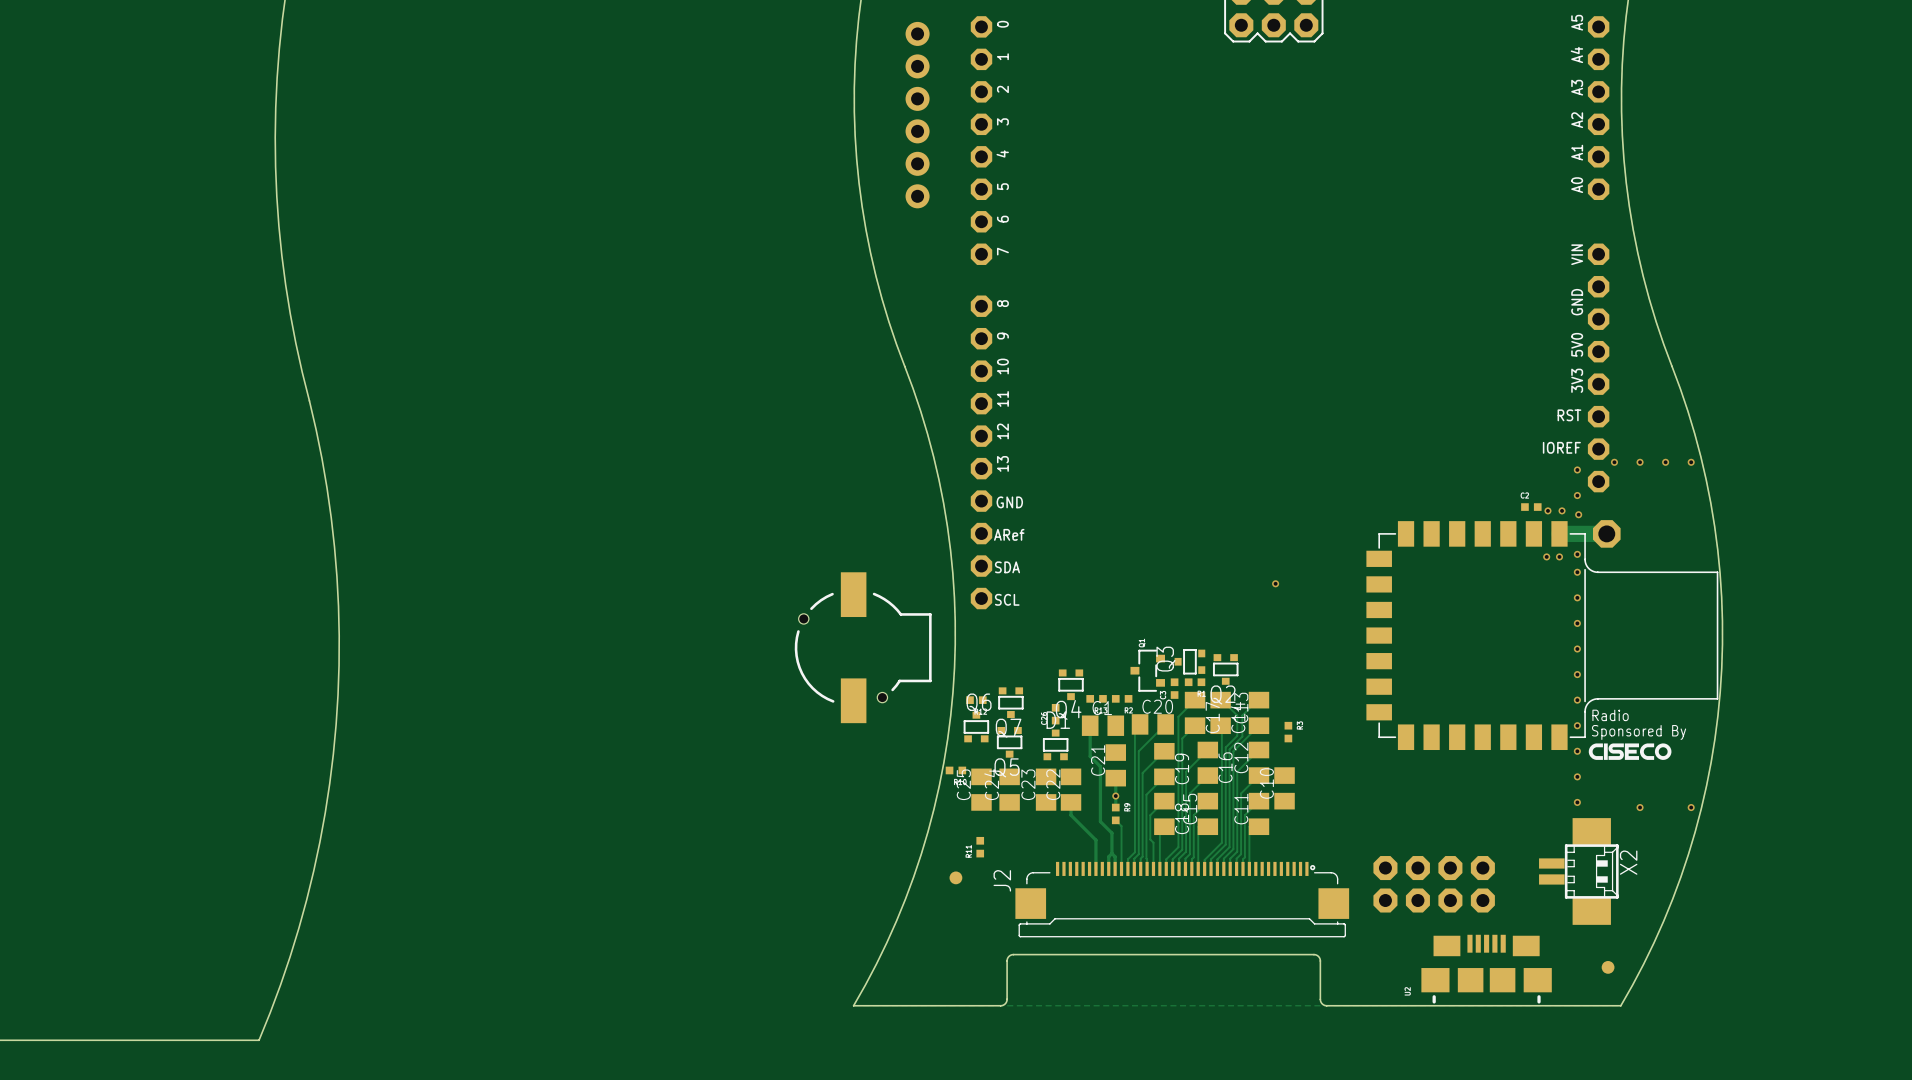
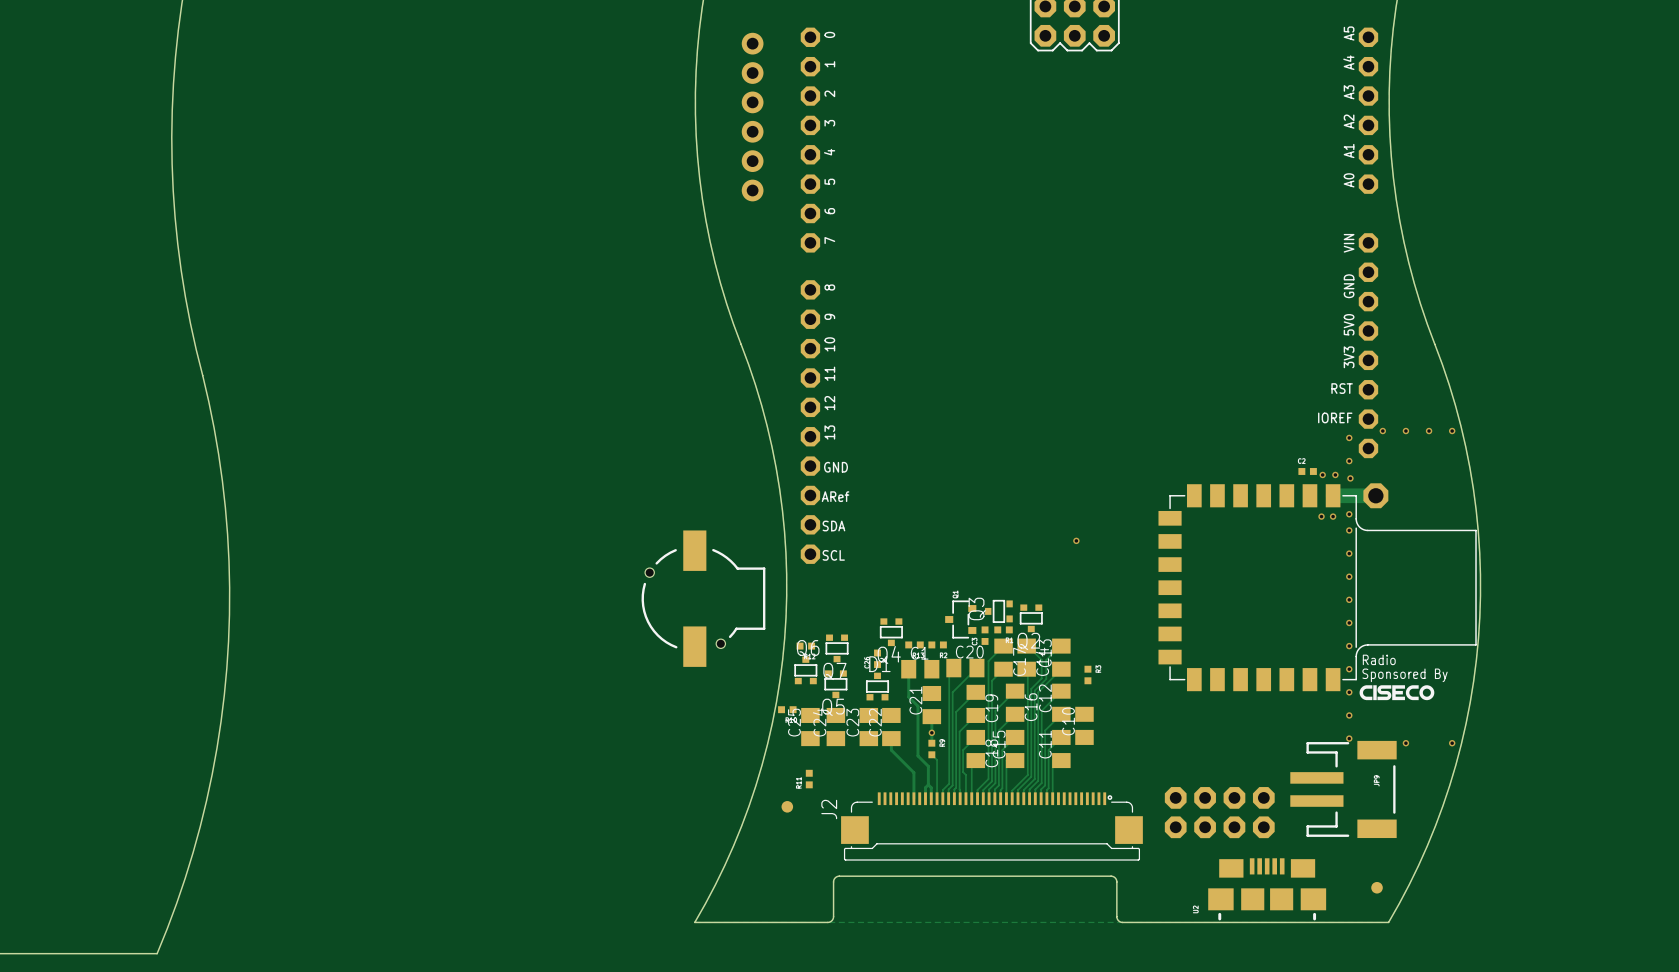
part: none -> (1343, 789)
X2: (1578, 871) -> none

